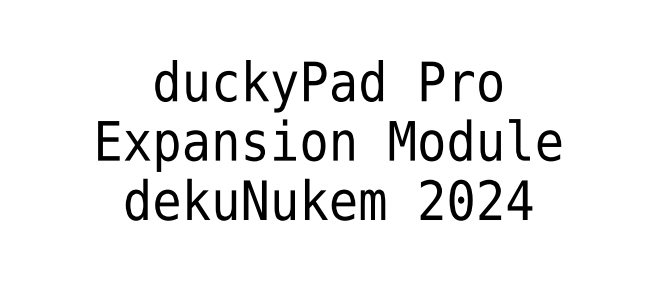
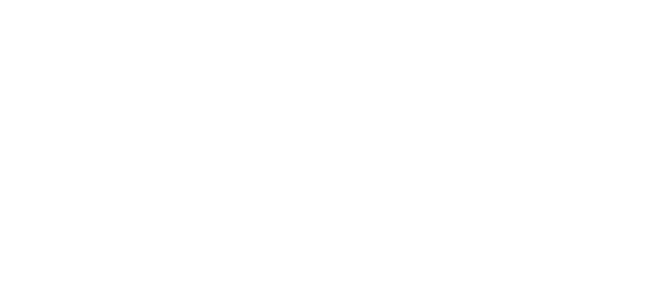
text: duckyPad Pro (328, 86) -> none
text: Expansion Module (329, 145) -> none
text: dekuNukem 2024 (329, 199) -> none

